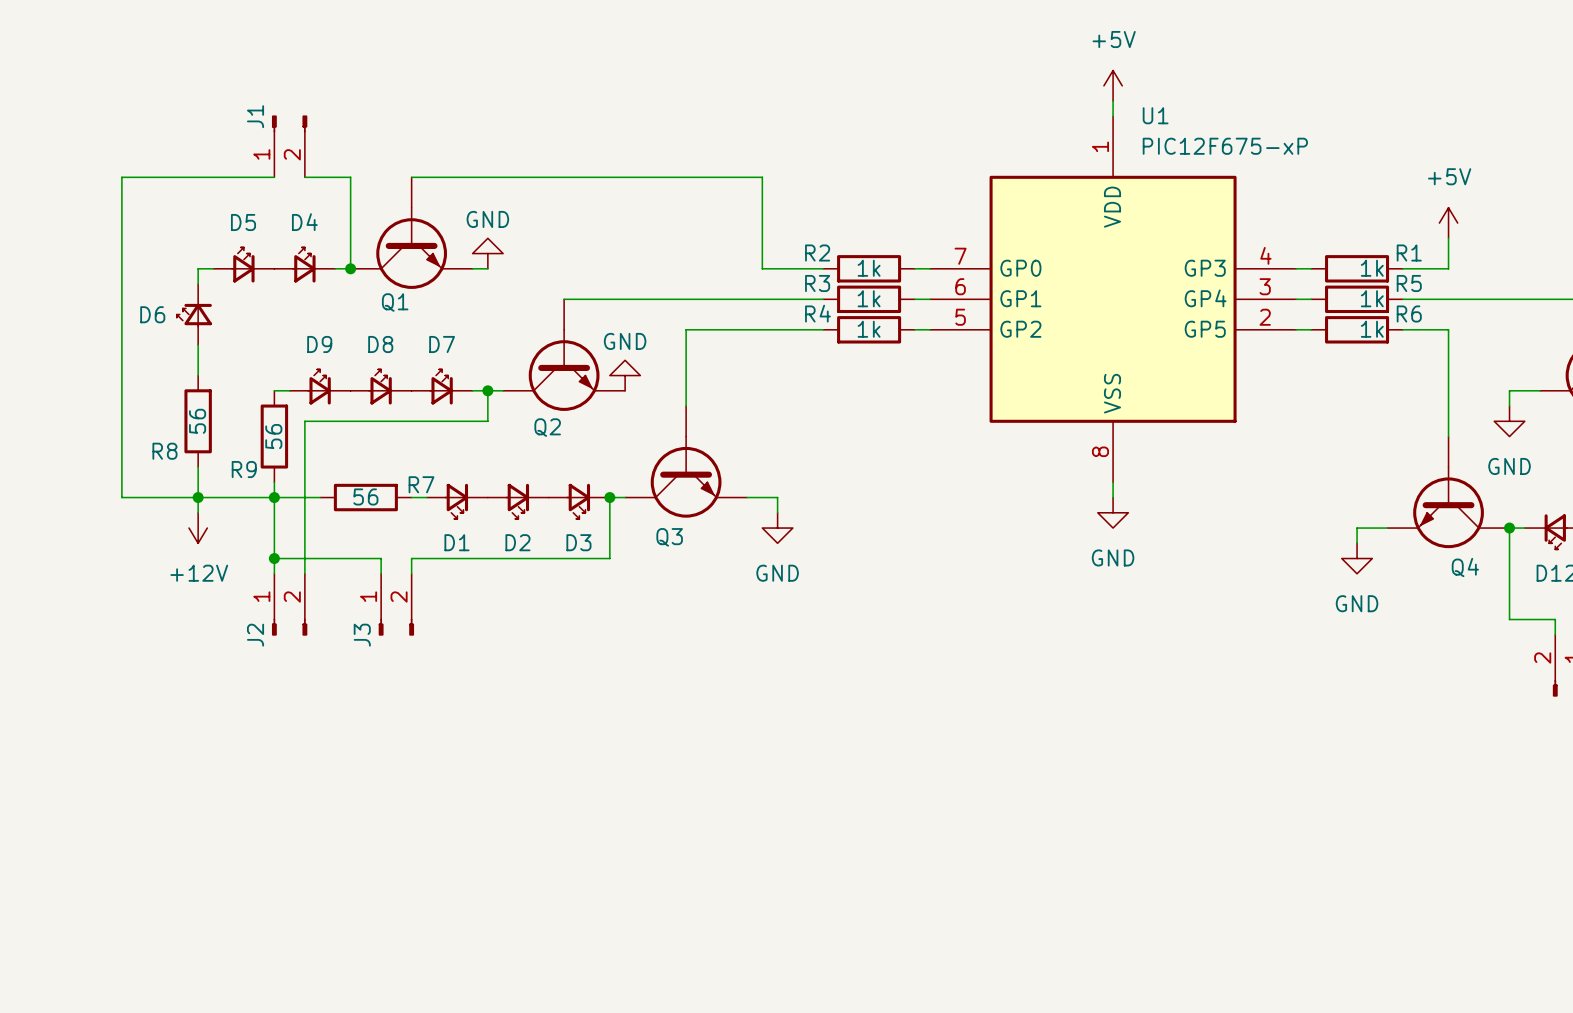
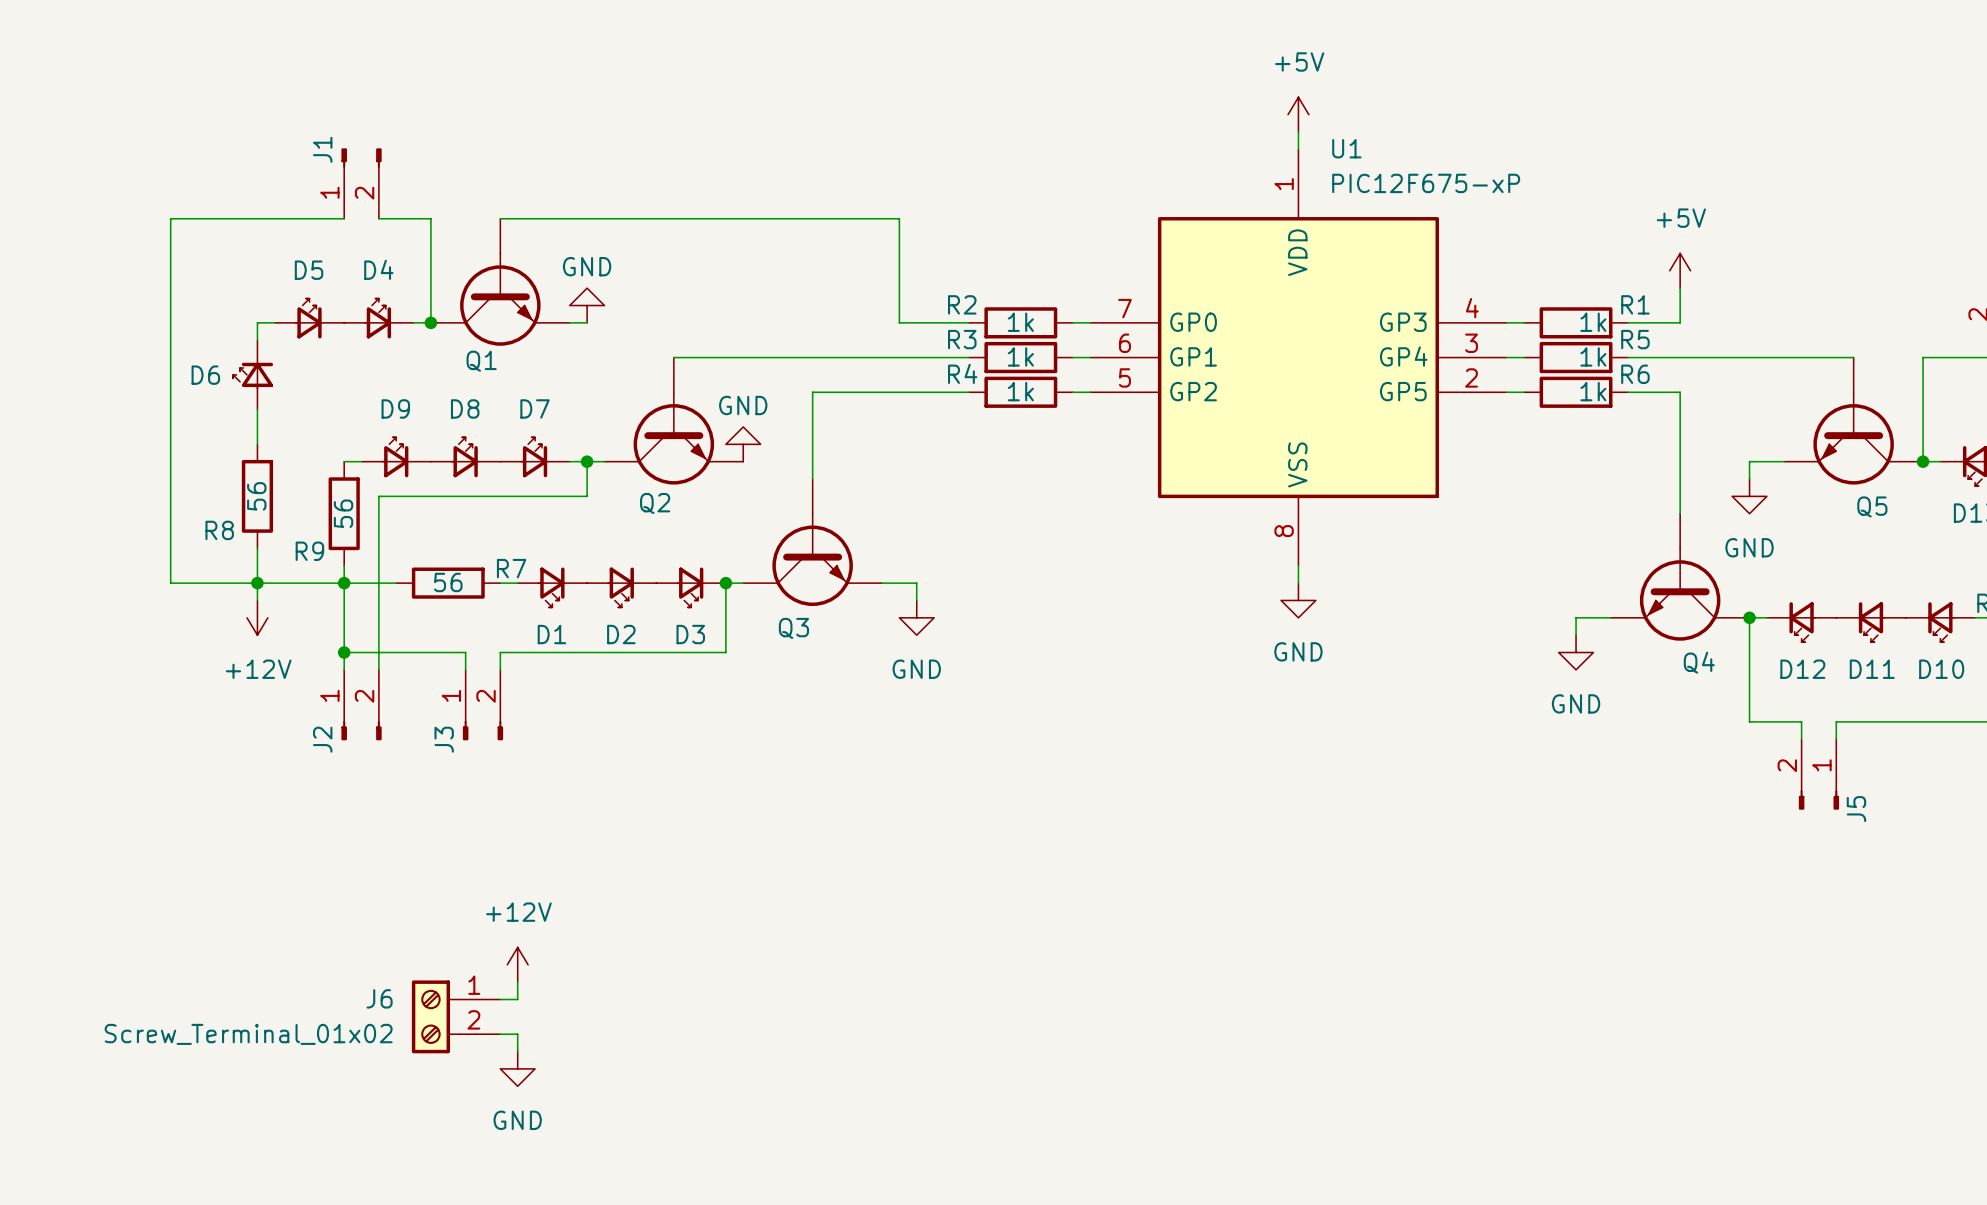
power symbol: none -> +12V (517, 964)
wire: none -> (517, 982) (517, 999) (500, 999)
J6: none -> Screw_Terminal_01x02 (456, 1016)
wire: none -> (500, 1034) (517, 1034) (517, 1051)
power symbol: none -> GND (517, 1068)

